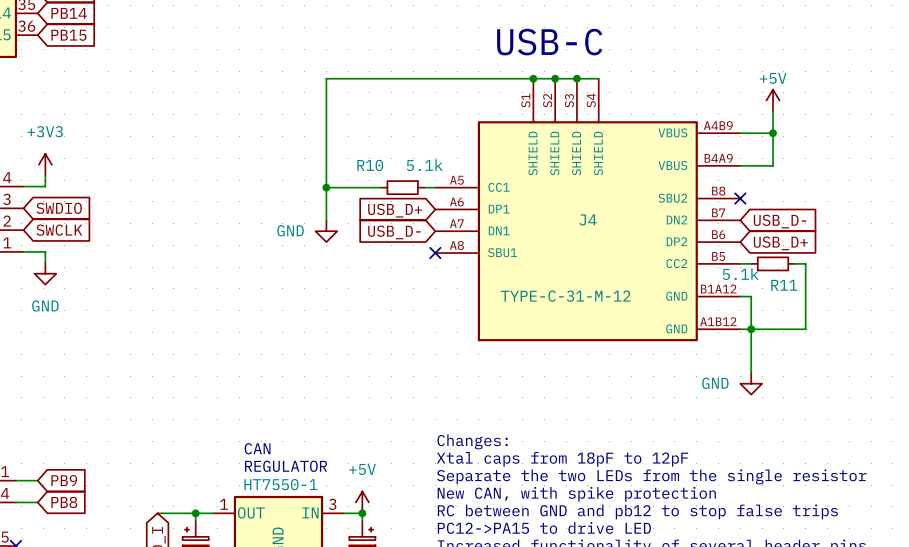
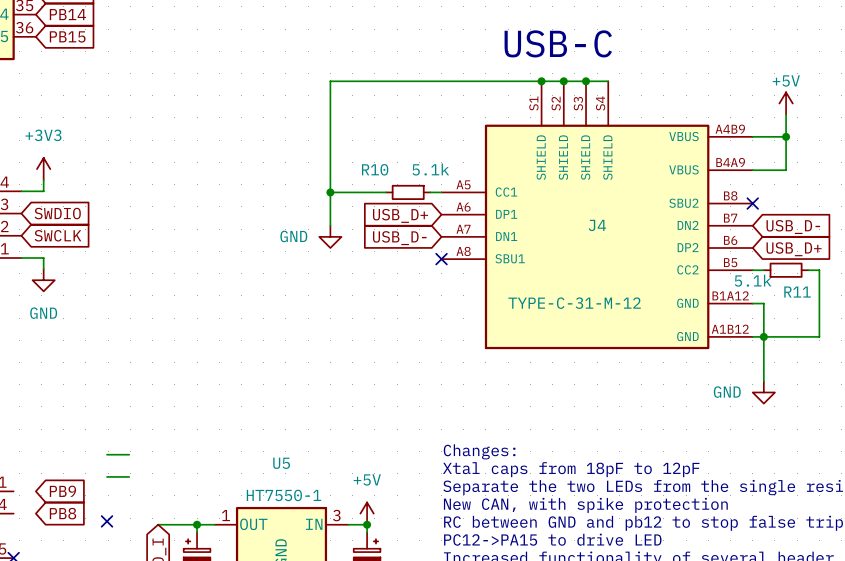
text: CAN (257, 448) -> none
U5 name: none -> U5 (281, 463)
text: REGULATOR (286, 466) -> none
wire: (15, 480) (37, 480) -> (107, 454) (129, 454)
wire: (15, 502) (37, 502) -> (107, 476) (129, 476)
no-connect mark: none -> (107, 521)

